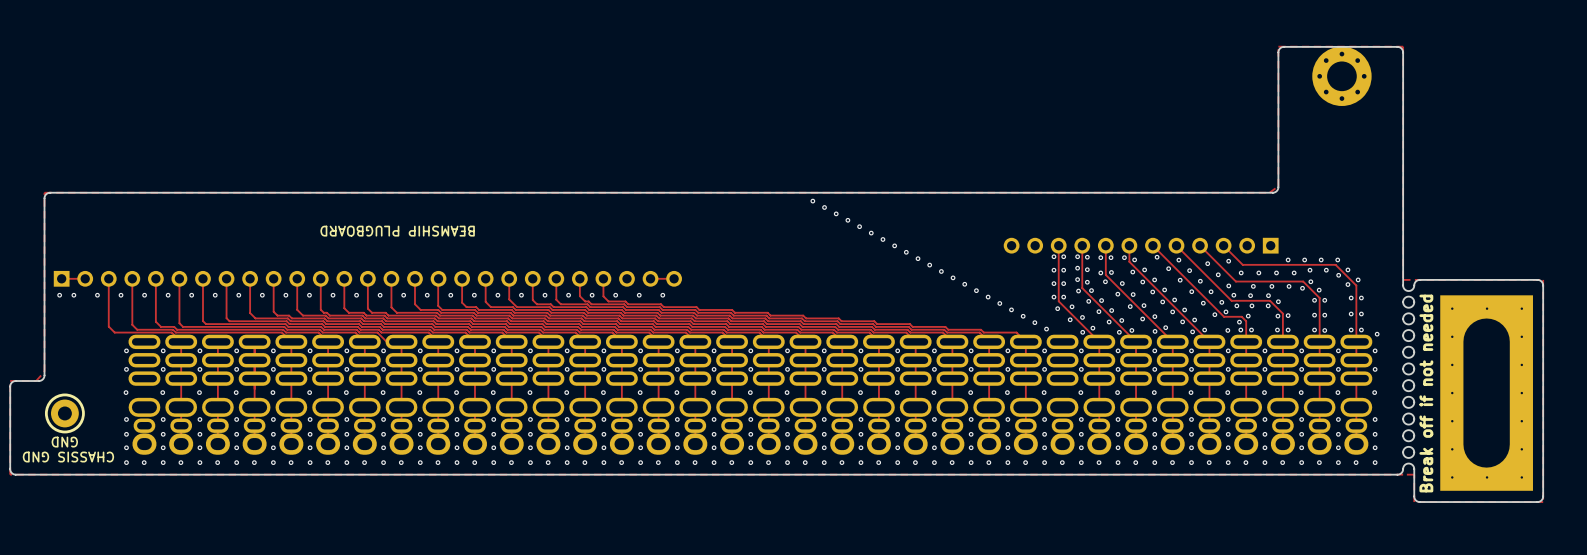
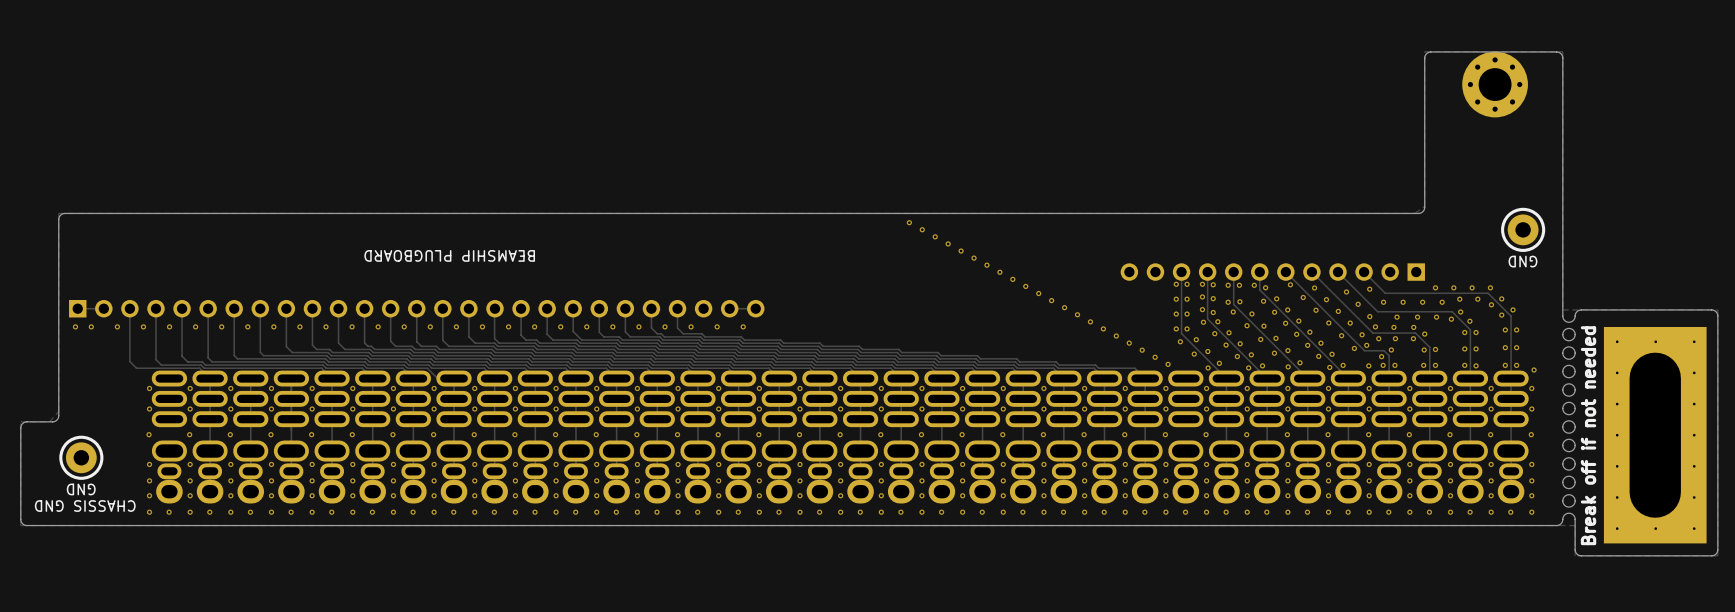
part: none -> (1523, 229)

